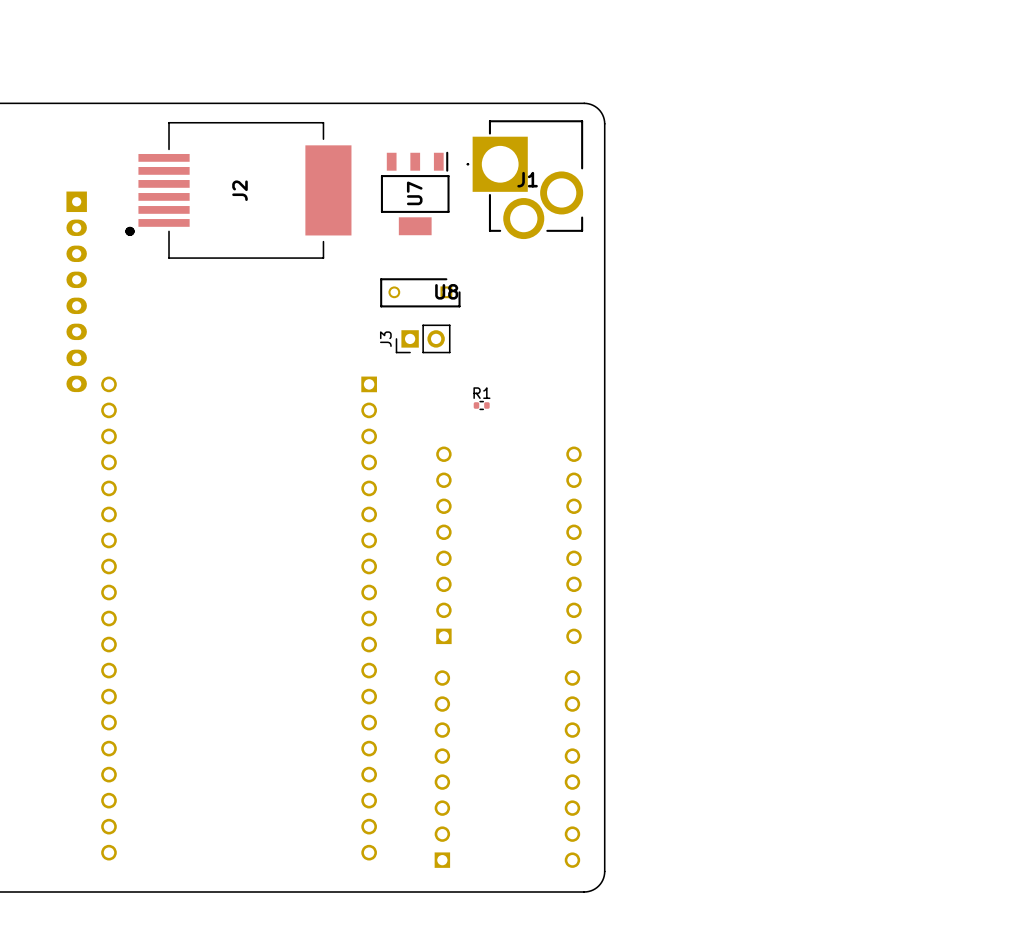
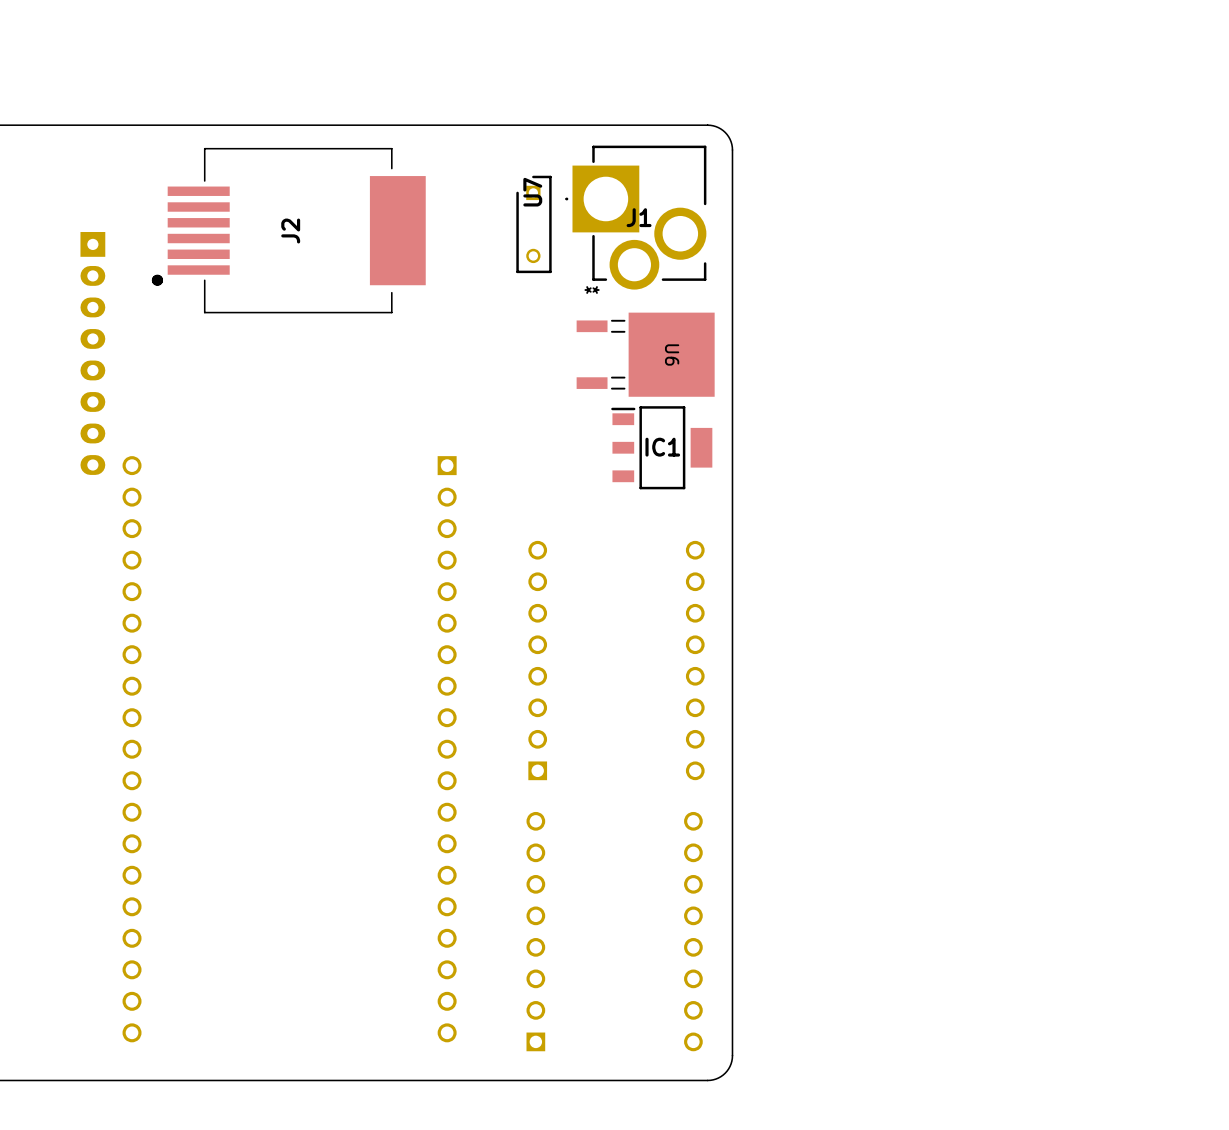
U7 footprint: [380, 151, 450, 236] -> [516, 175, 552, 274]
U7 name position: U7 (414, 193) -> U7 (532, 192)
U8: (420, 292) -> none
U6: none -> (645, 354)
J3: (423, 338) -> none
IC1: none -> (661, 447)
R1: (481, 405) -> none

